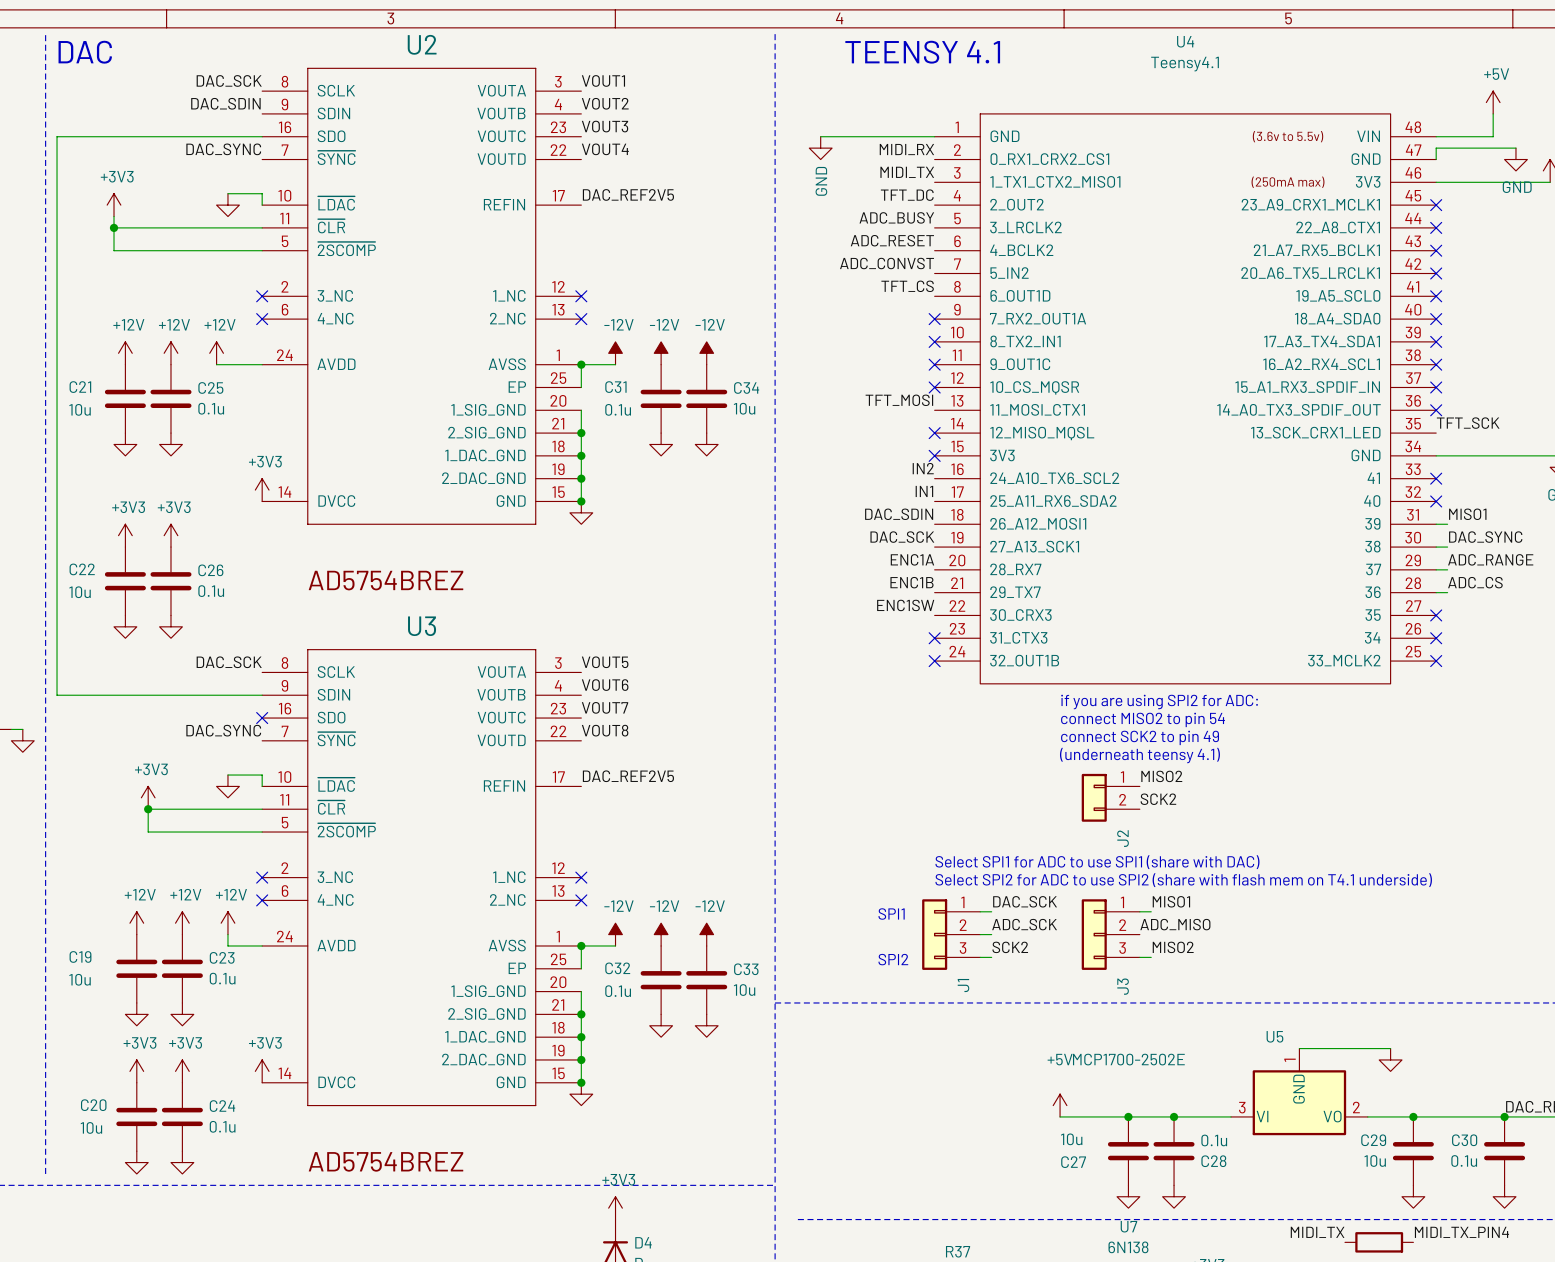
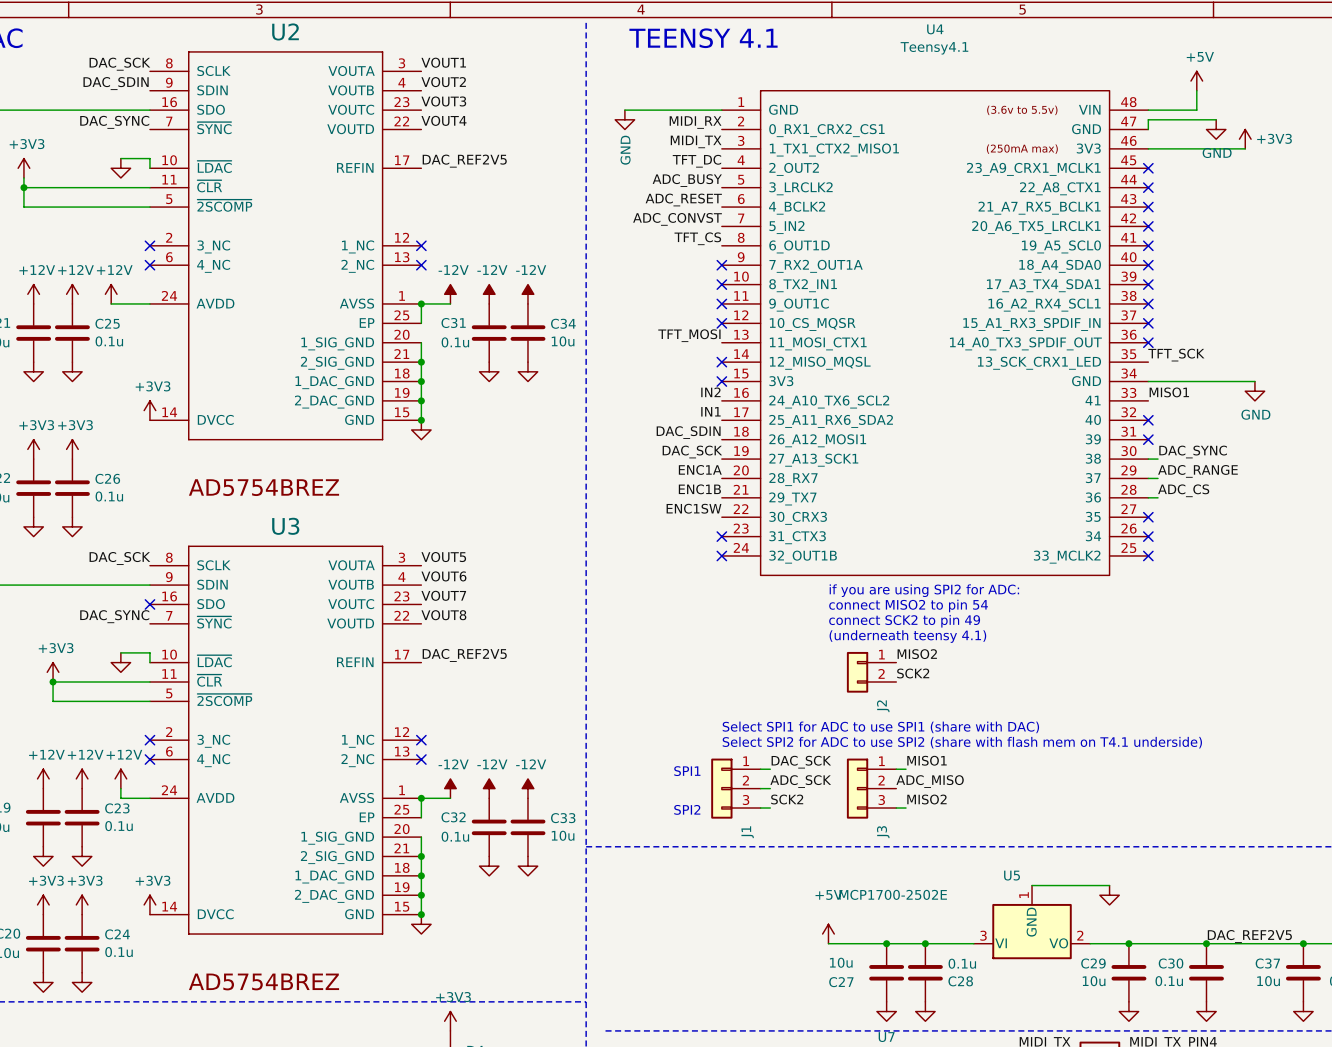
no-connect mark position: (1436, 478) -> (1148, 439)
label position: MISO1 (1467, 514) -> MISO1 (1169, 392)
wire: (1436, 524) (1447, 524) -> none

